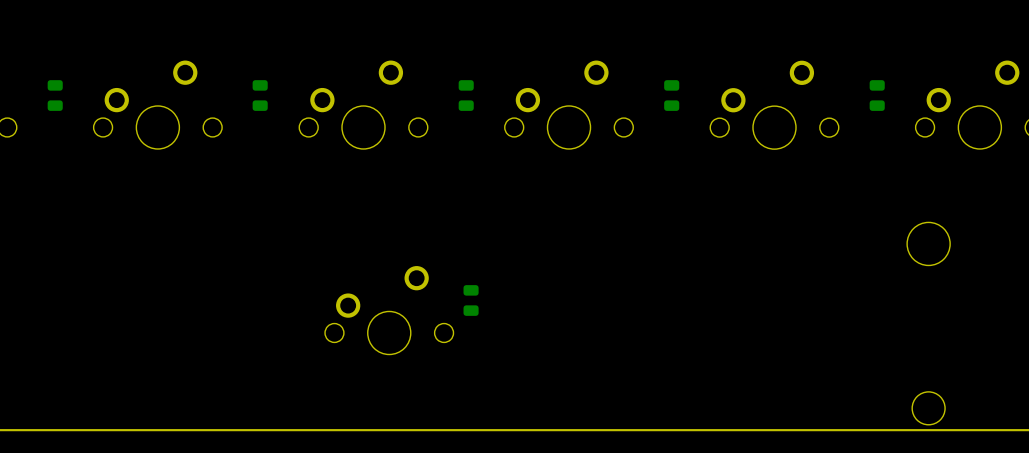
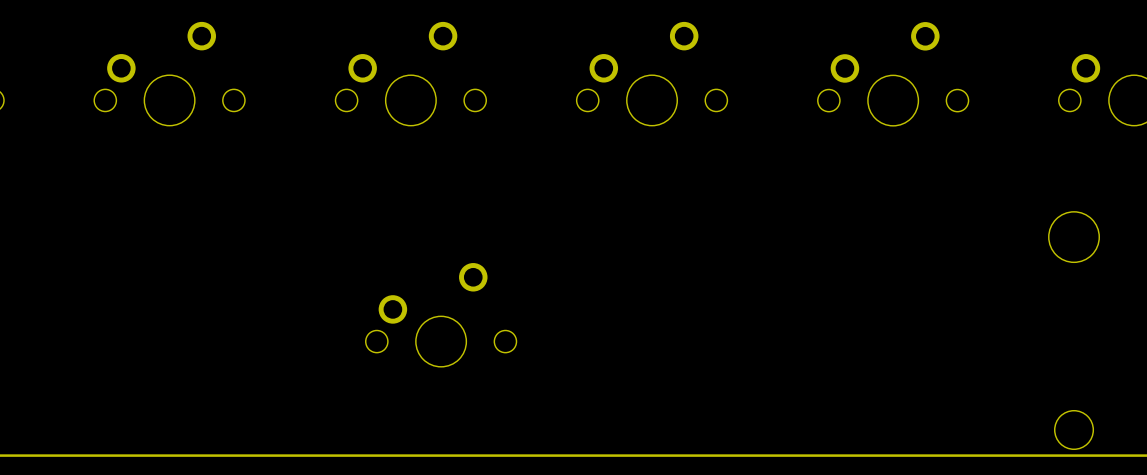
part: (55, 95) -> none
part: (260, 95) -> none
part: (466, 95) -> none
part: (671, 95) -> none
part: (877, 95) -> none
part: (471, 300) -> none

